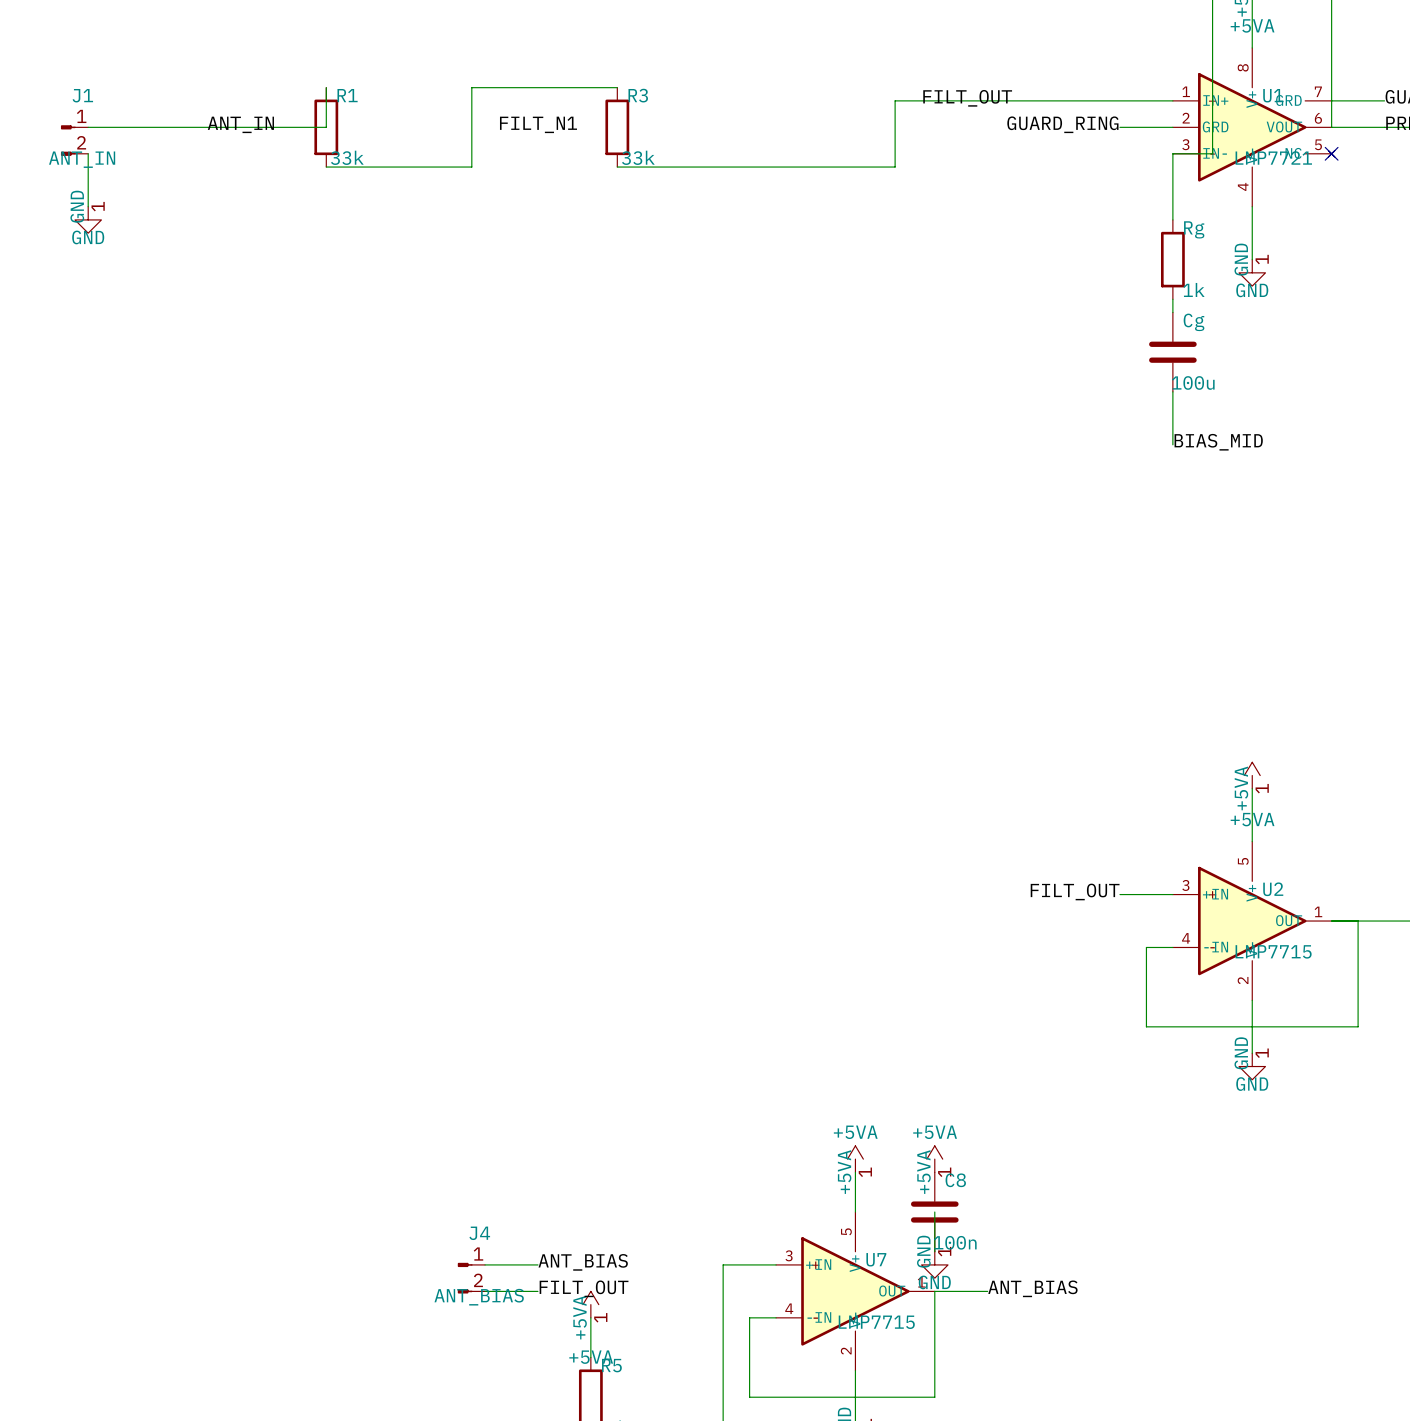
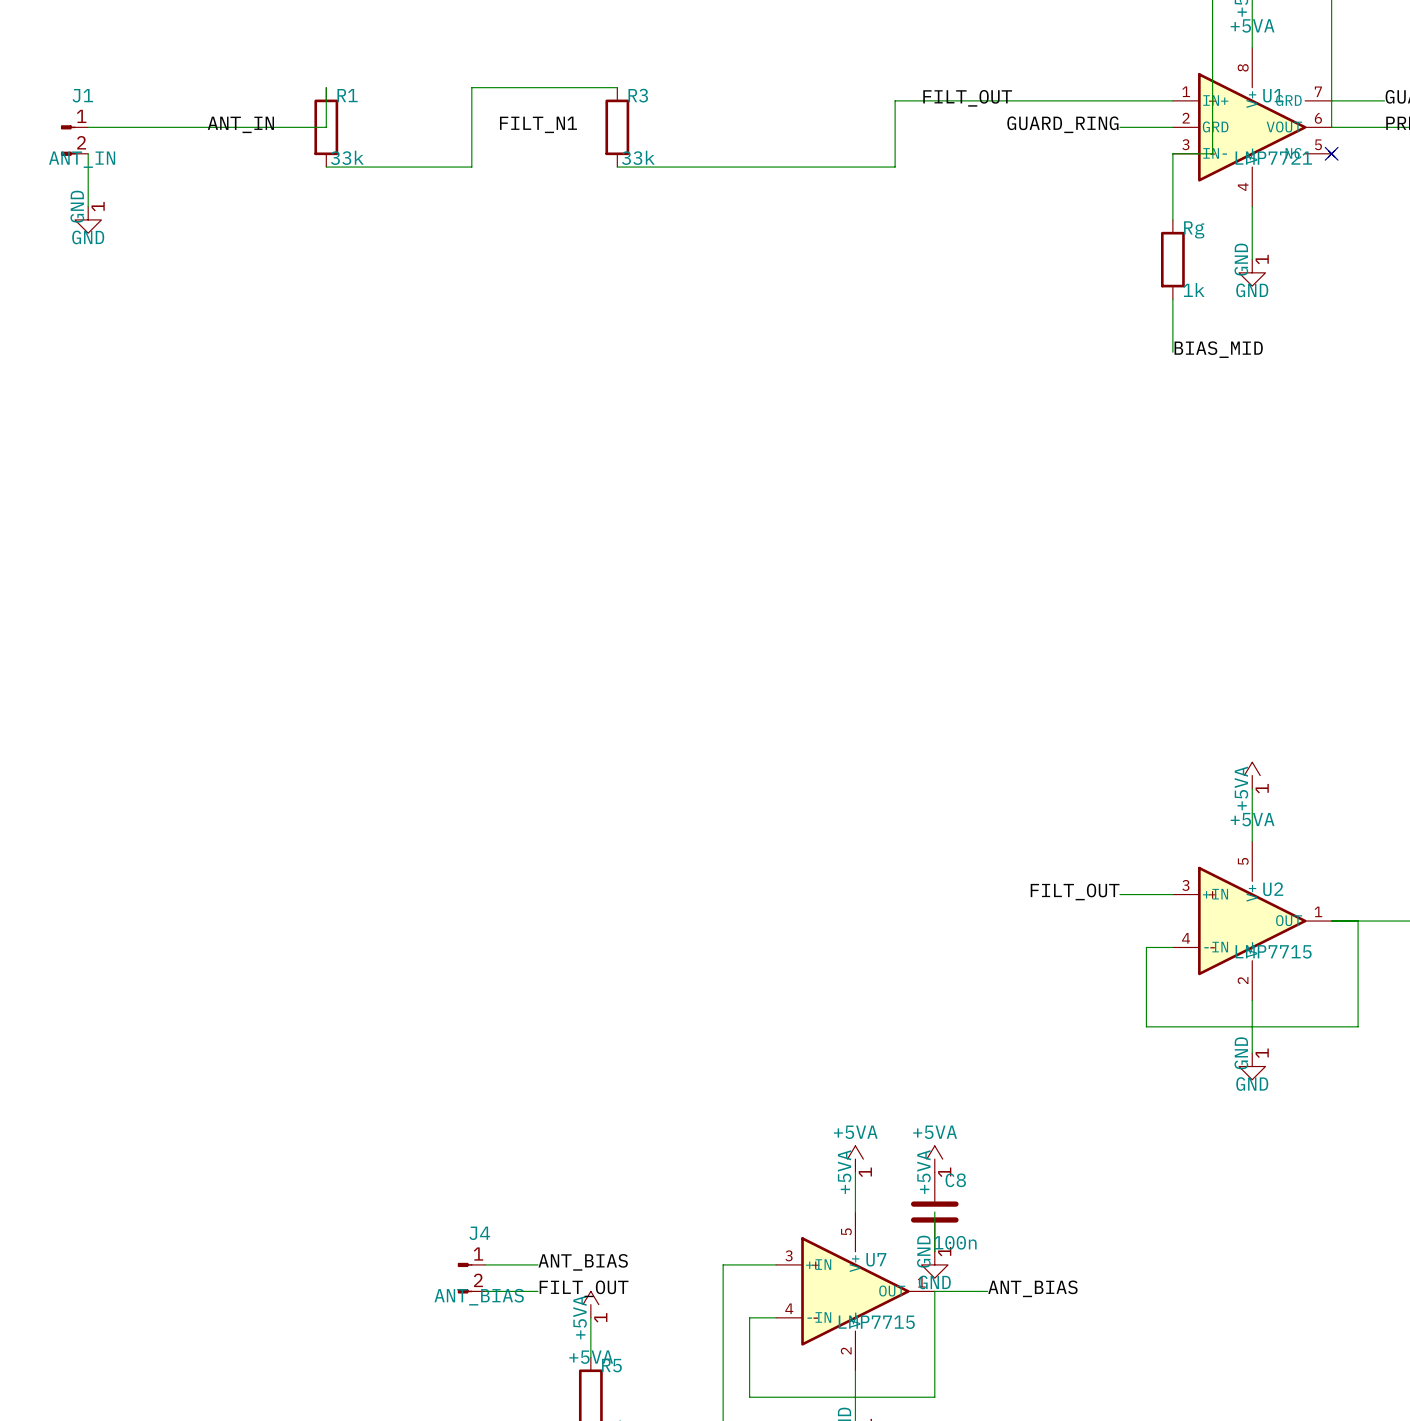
Cg: 100u (1172, 352) -> none
wire: (1172, 391) (1172, 444) -> none
label position: BIAS_MID (1218, 442) -> BIAS_MID (1218, 349)

